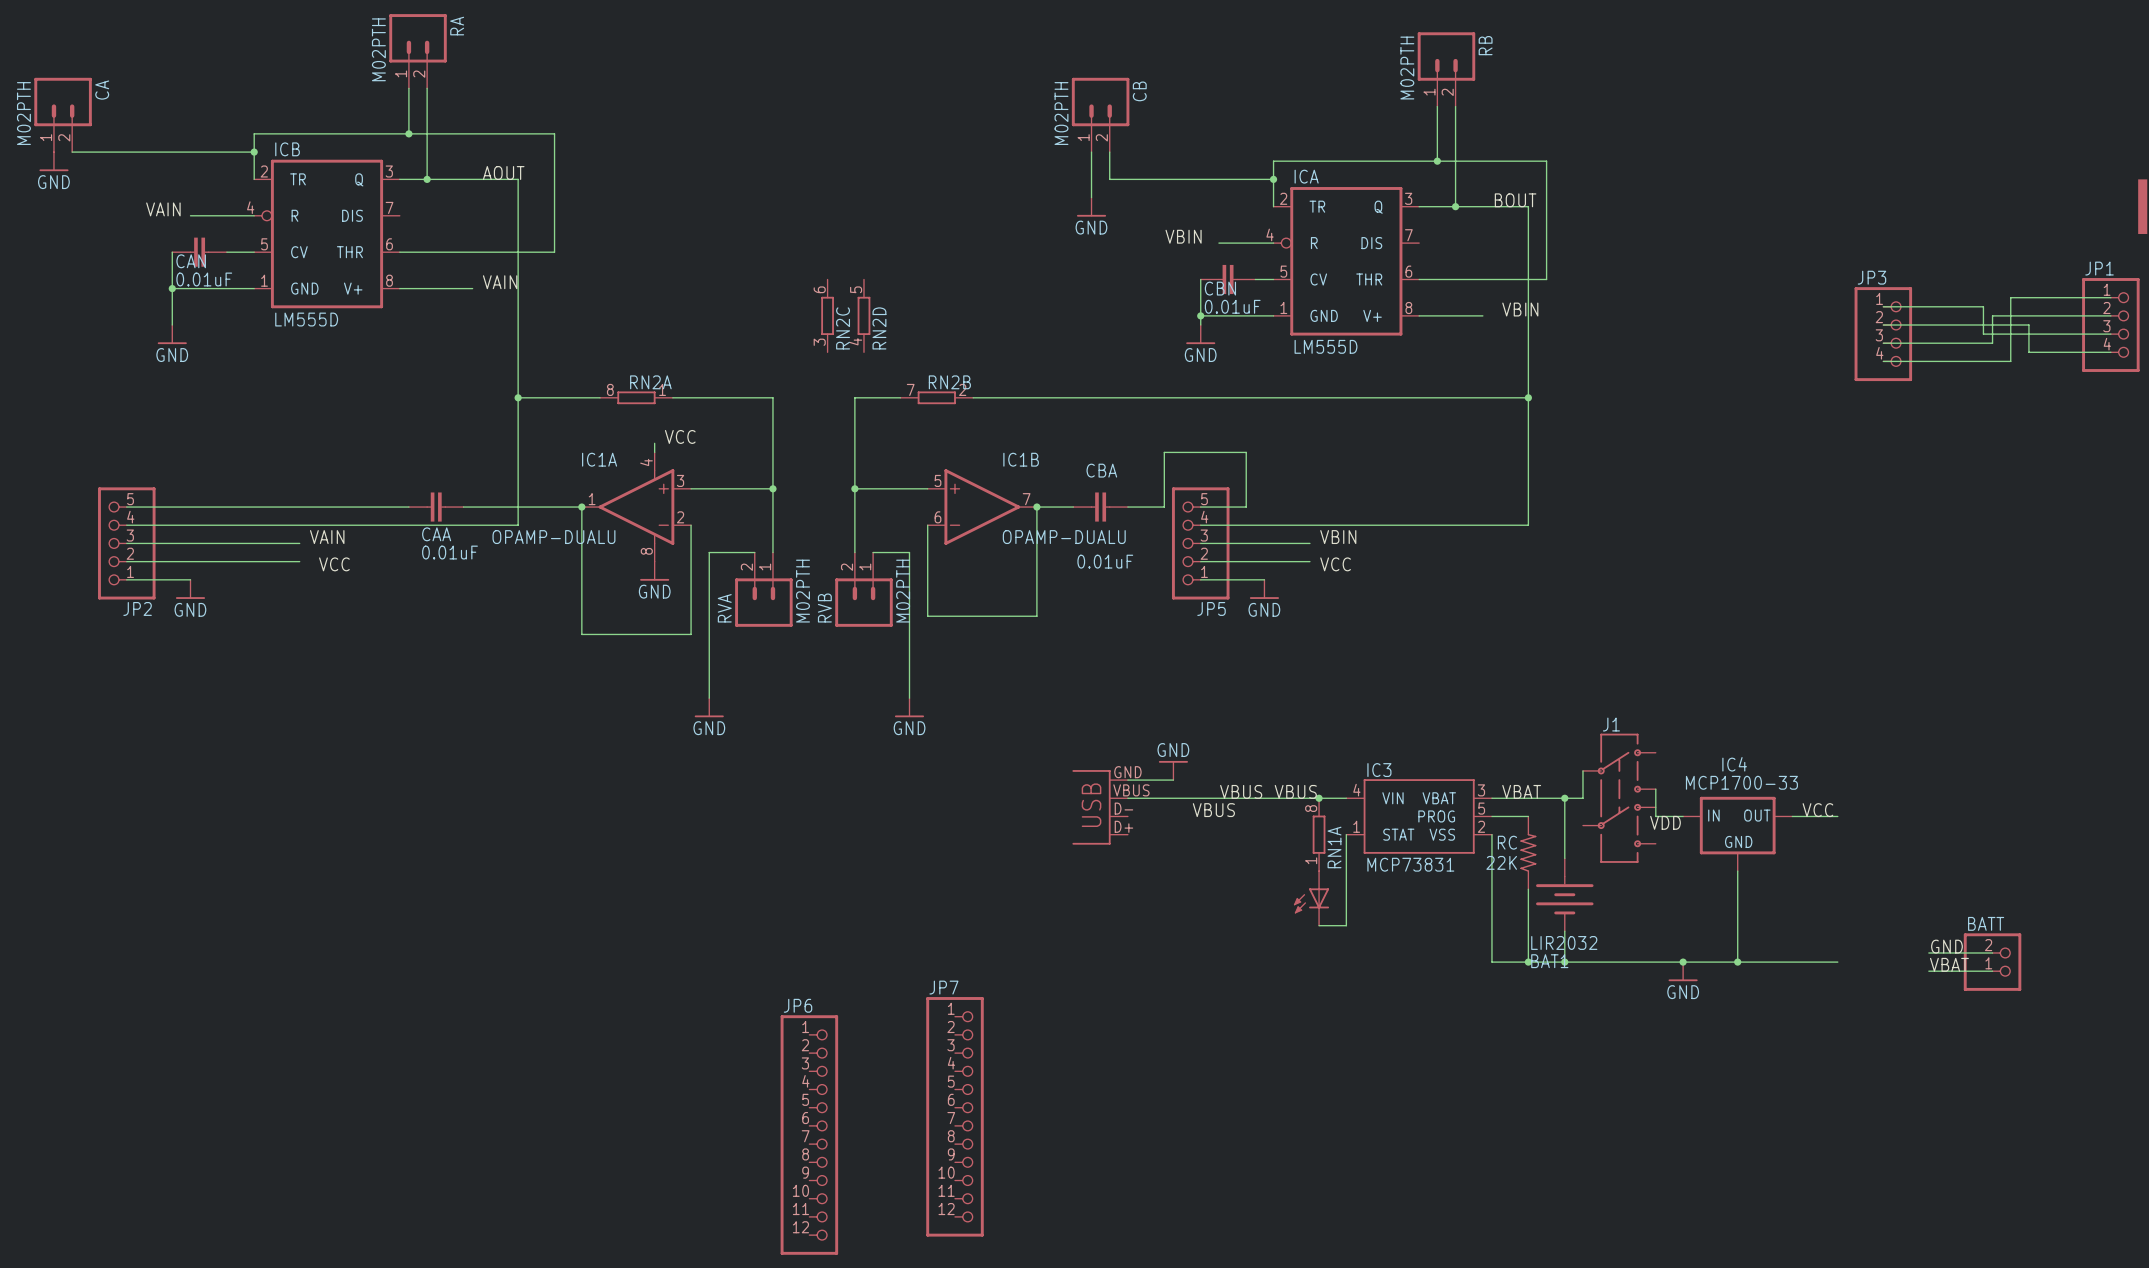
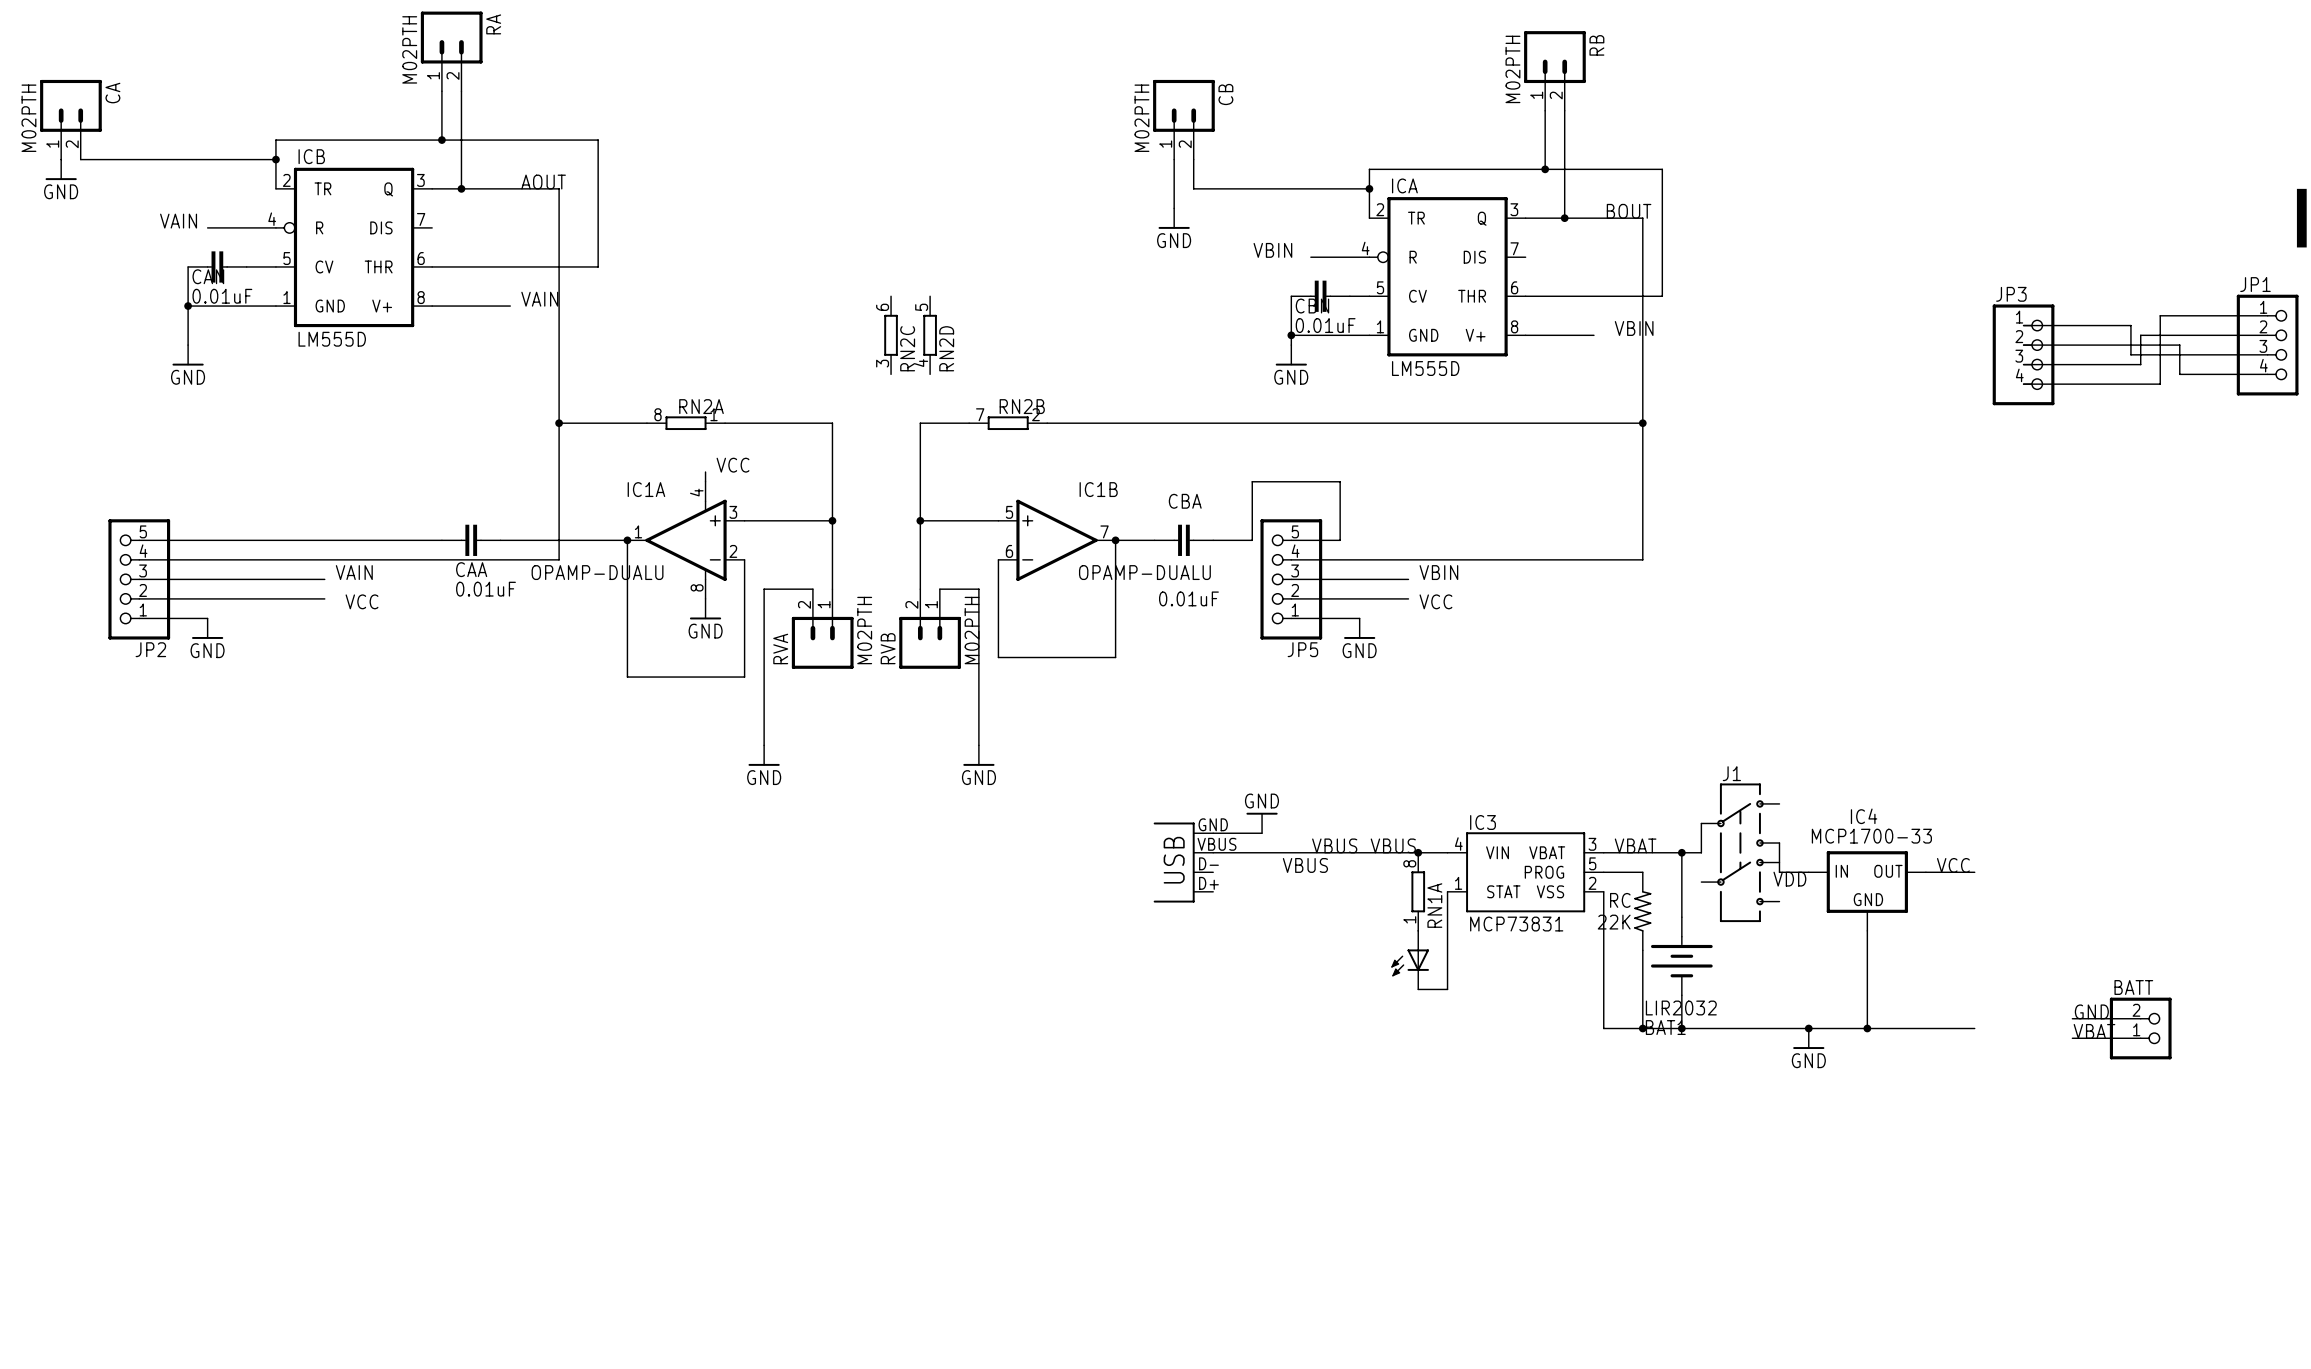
JP7: (955, 1116) -> none
JP6: (809, 1135) -> none

